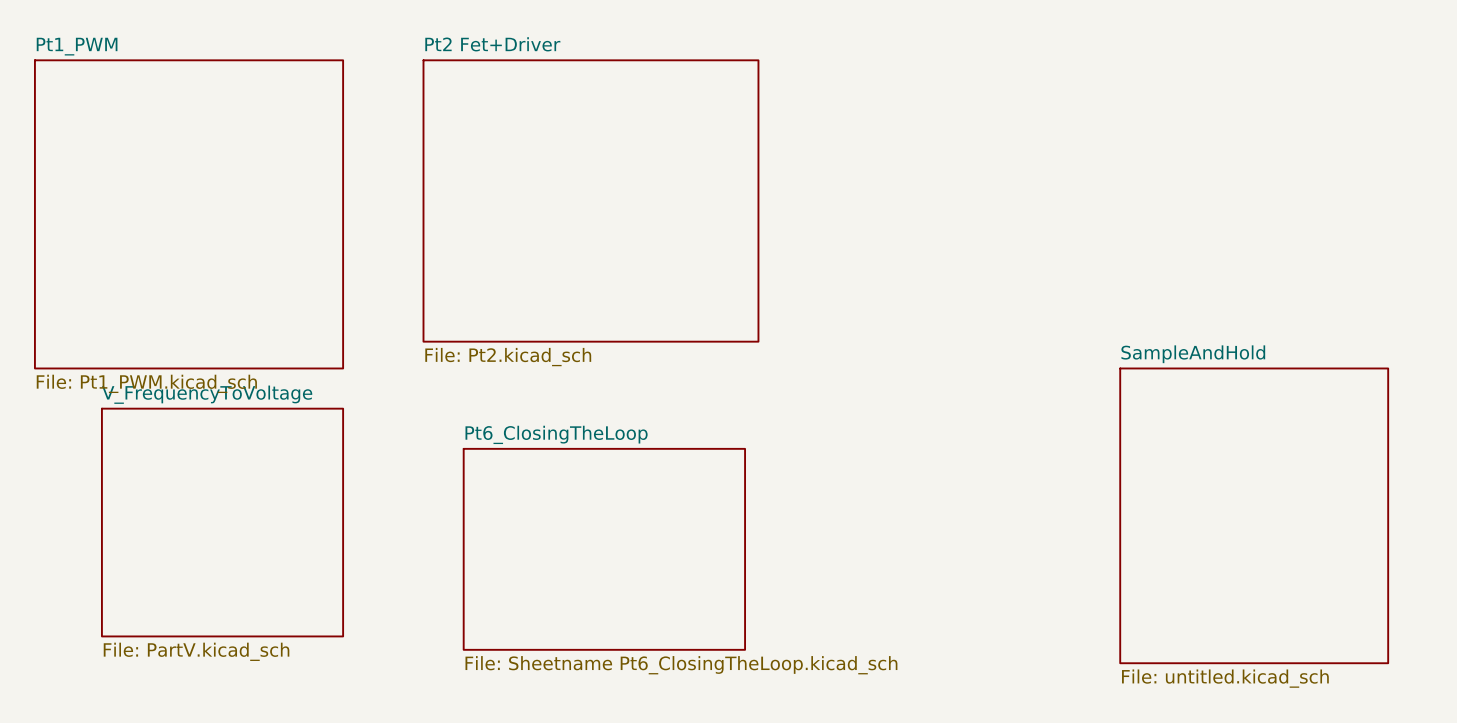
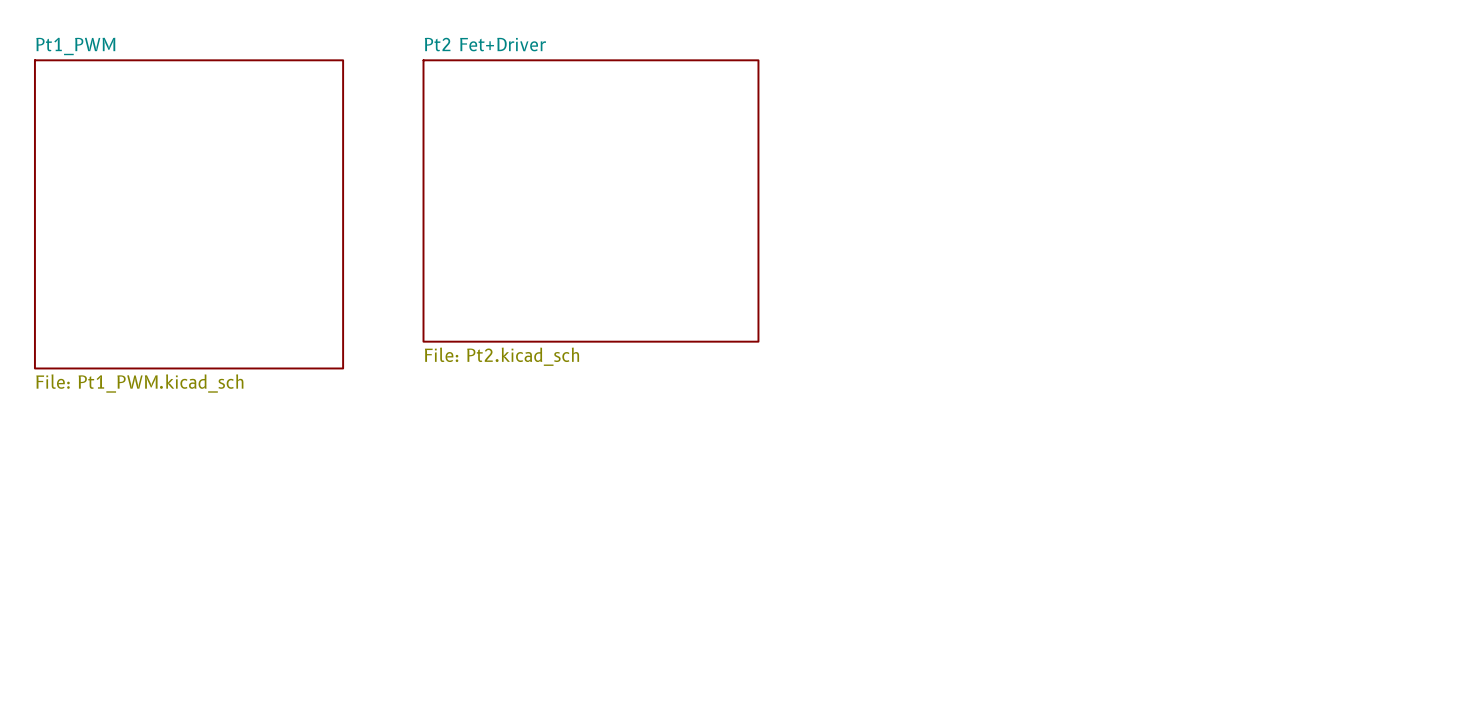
sheet SampleAndHold: File: untitled.kicad_sch (1254, 515) -> none
sheet V_FrequencyToVoltage: File: PartV.kicad_sch (222, 522) -> none
sheet Pt6_ClosingTheLoop: File: Sheetname Pt6_ClosingTheLoop.kicad_sch (604, 549) -> none

